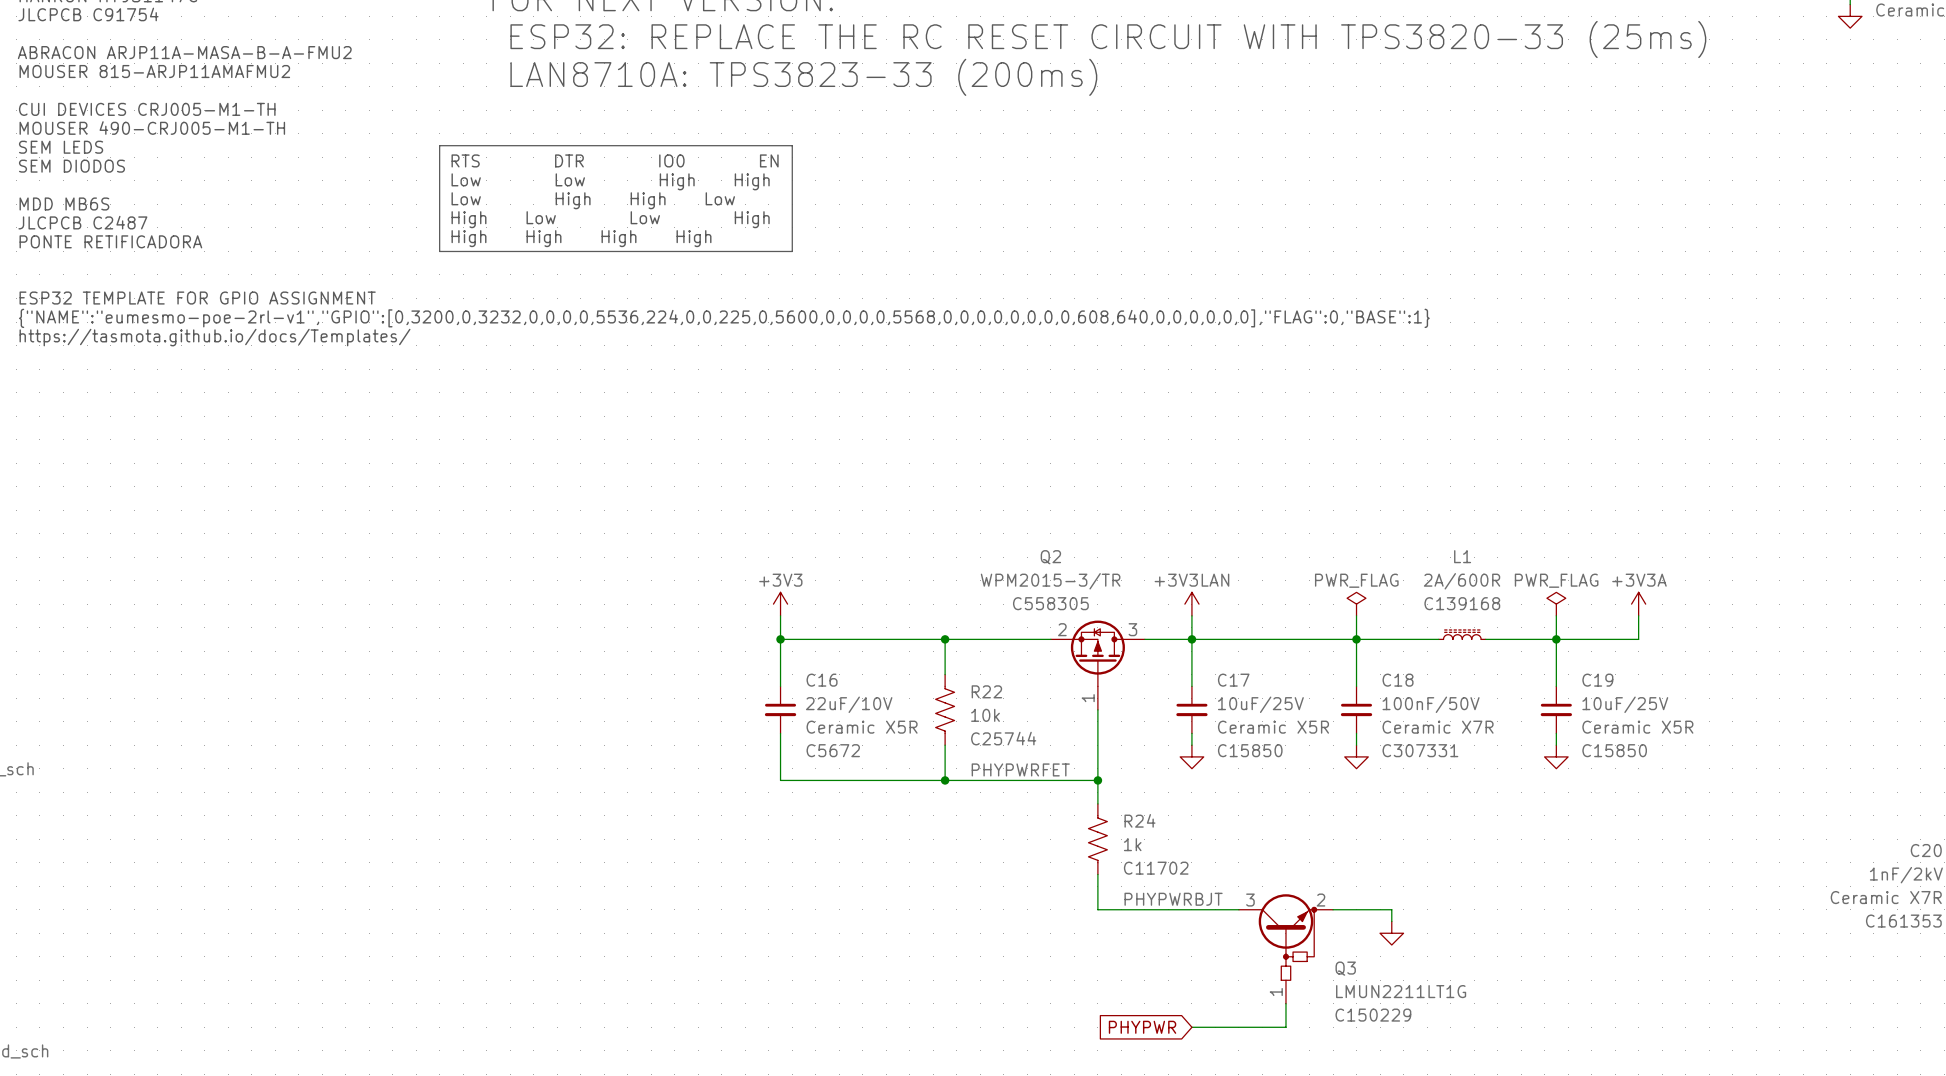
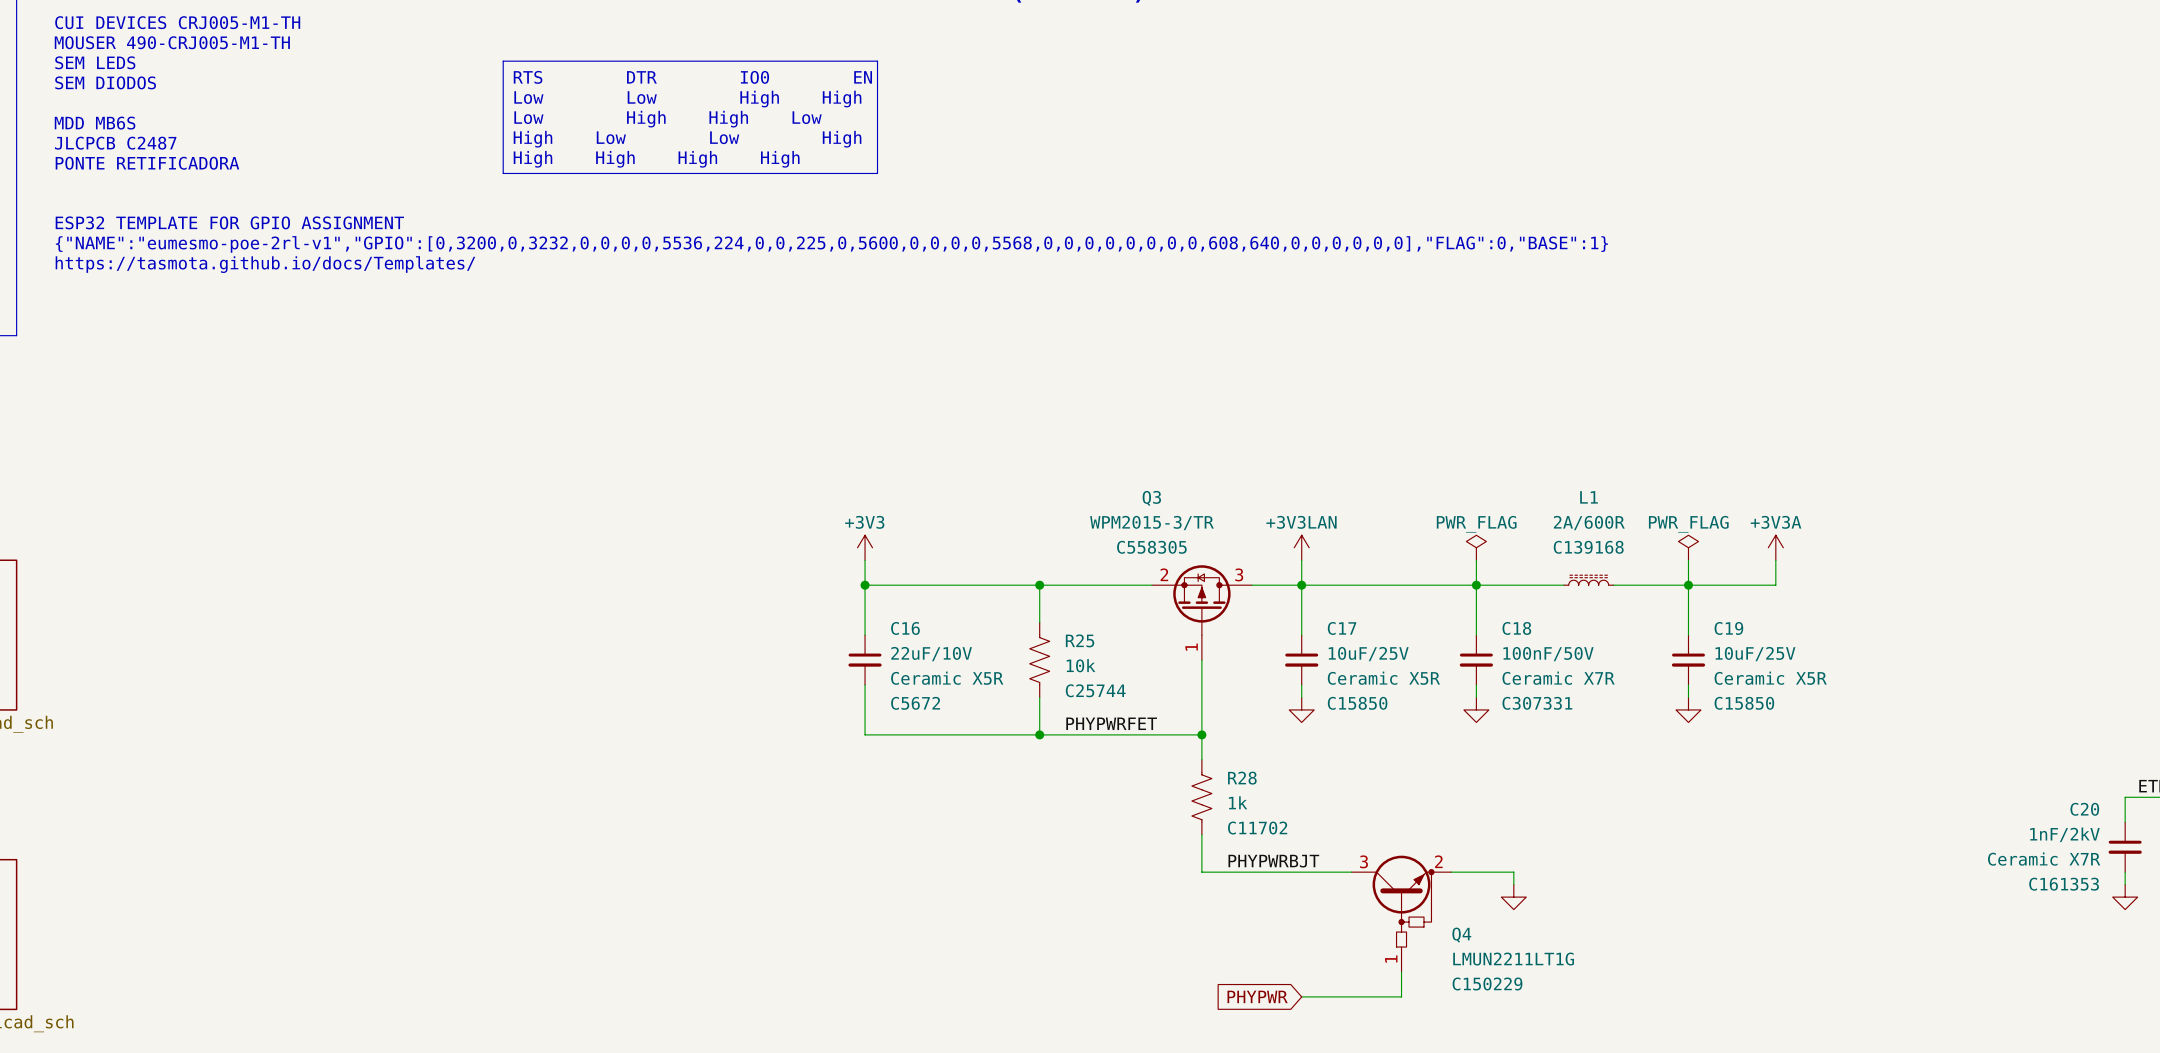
Q2 name: Q2 (1050, 557) -> Q3 (1151, 498)
R22 name: R22 (986, 691) -> R25 (1080, 640)
R24 name: R24 (1139, 820) -> R28 (1242, 778)
Q3 name: Q3 (1345, 968) -> Q4 (1461, 935)

